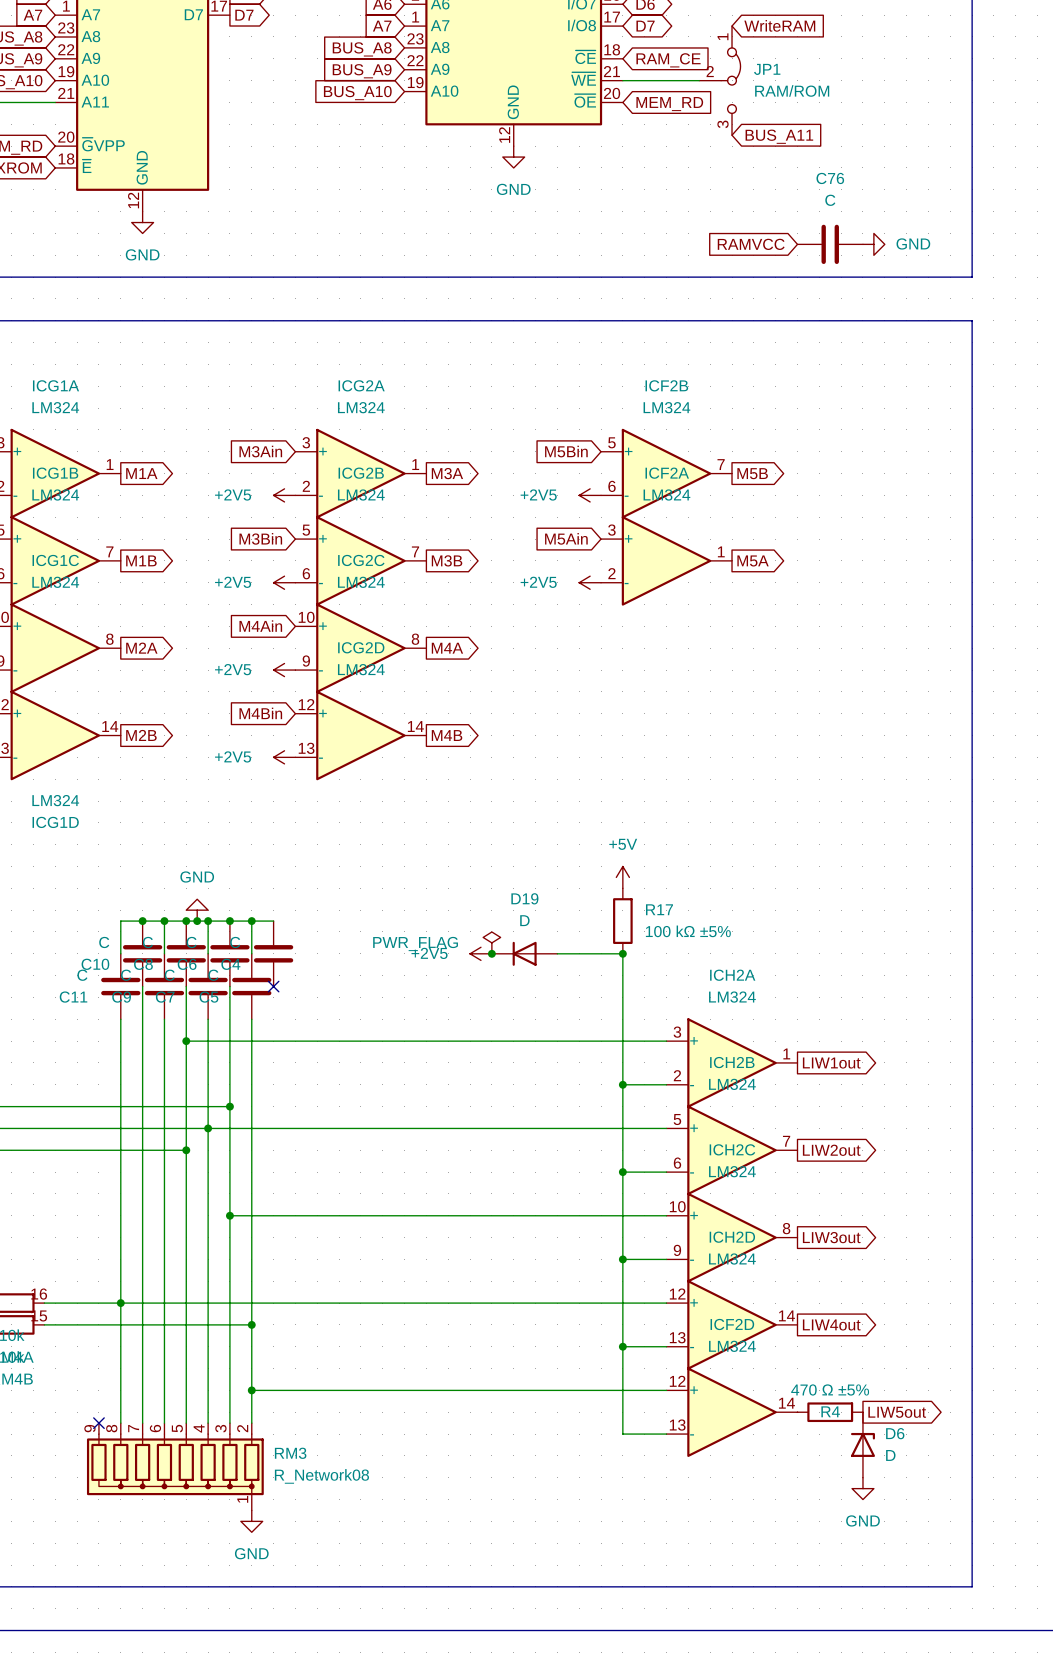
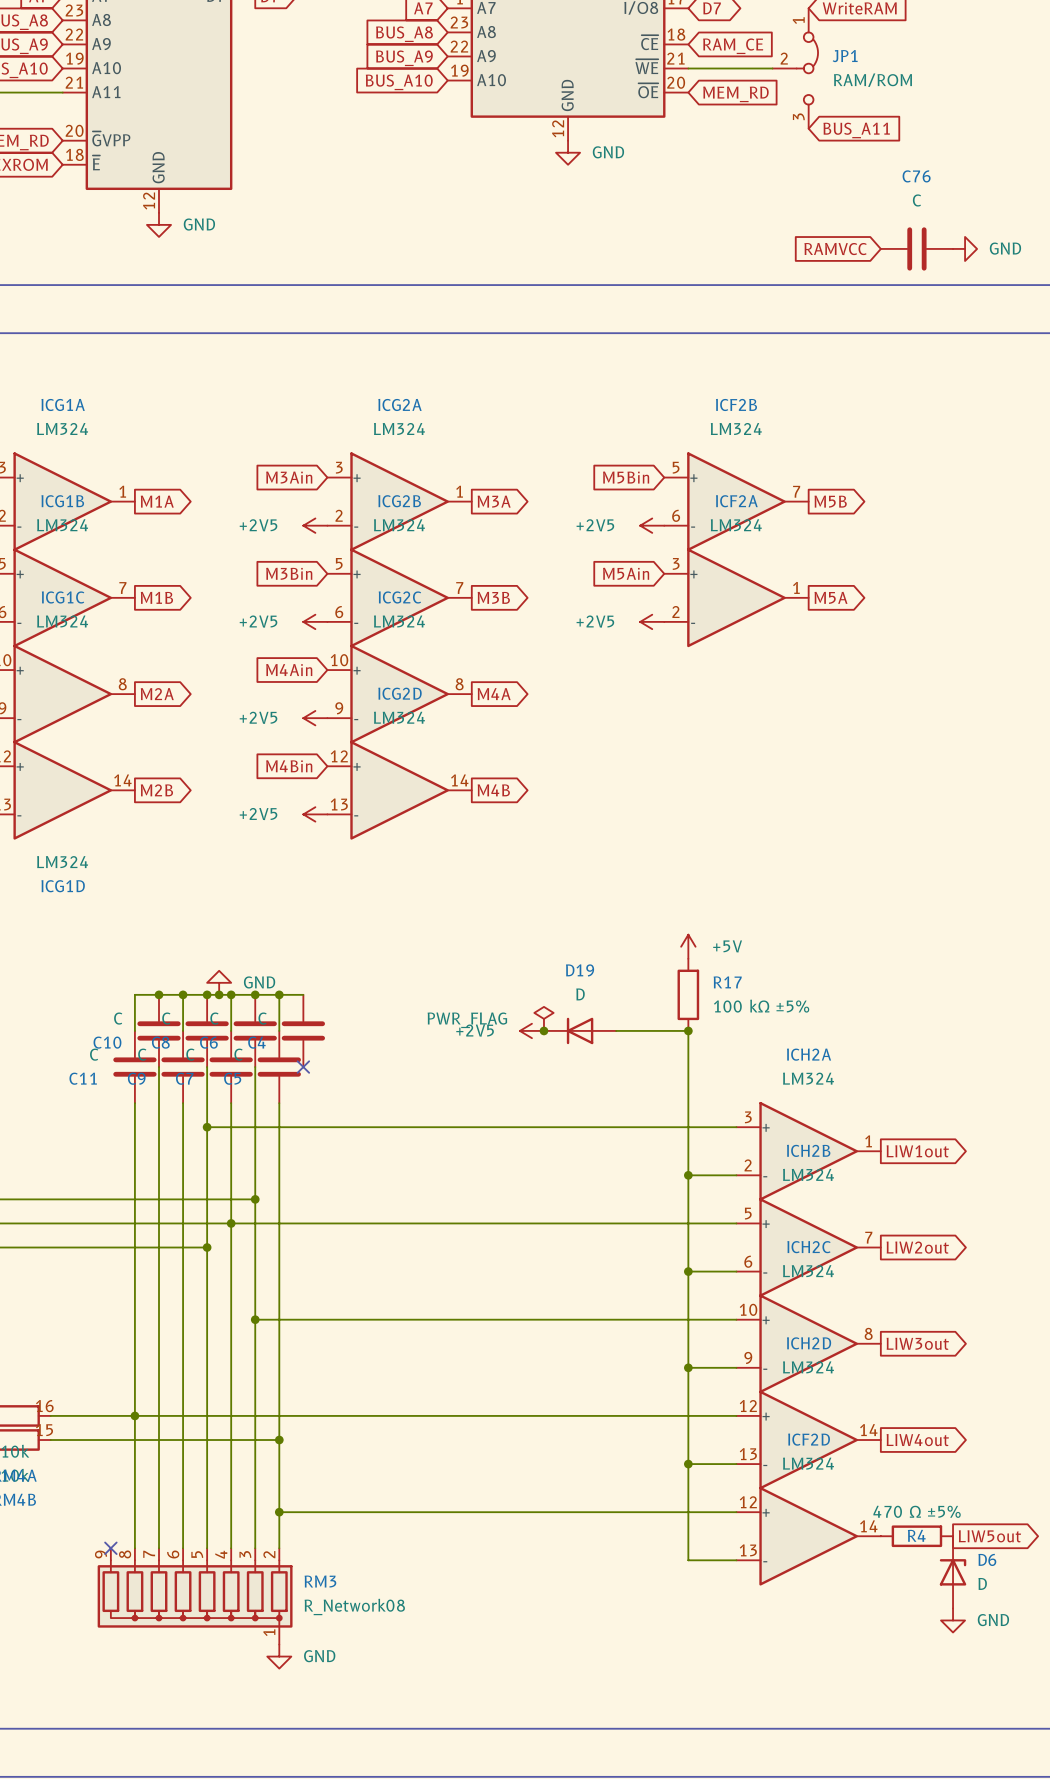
power symbol text position: GND (513, 189) -> GND (608, 152)
power symbol text position: GND (142, 254) -> GND (199, 224)
power symbol text position: +5V (623, 844) -> +5V (727, 946)
power symbol text position: GND (197, 877) -> GND (259, 982)
power symbol text position: GND (863, 1520) -> GND (993, 1620)
power symbol text position: GND (251, 1553) -> GND (319, 1656)

